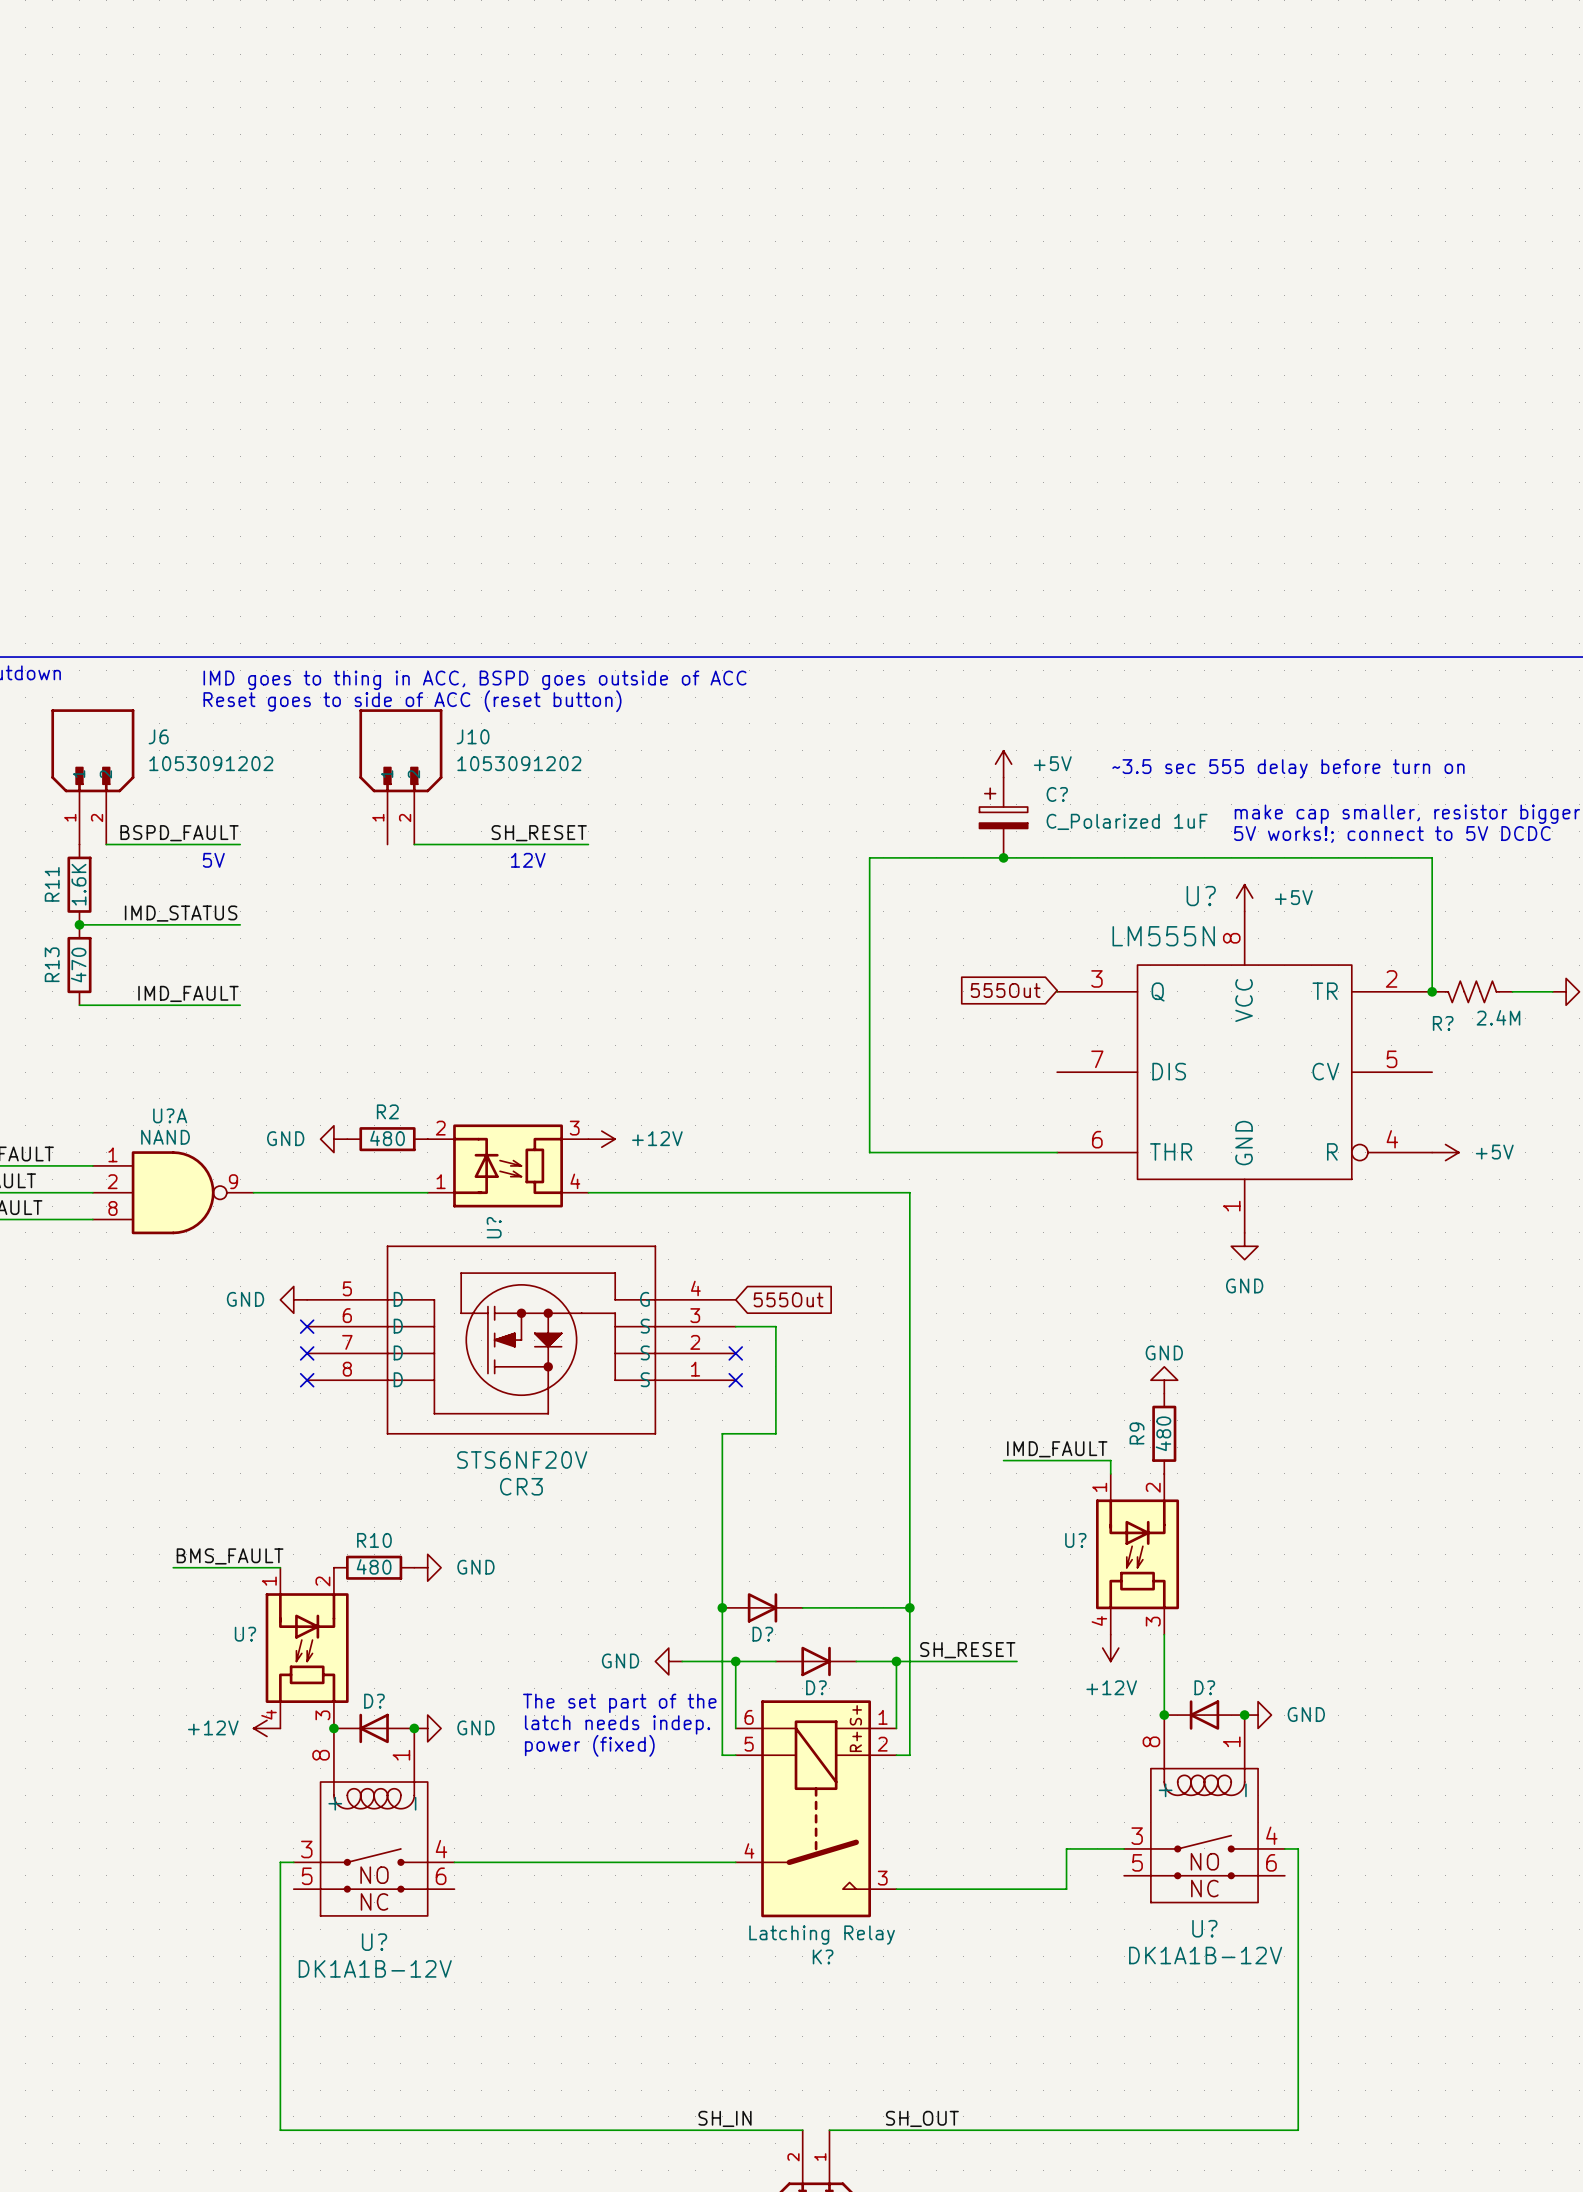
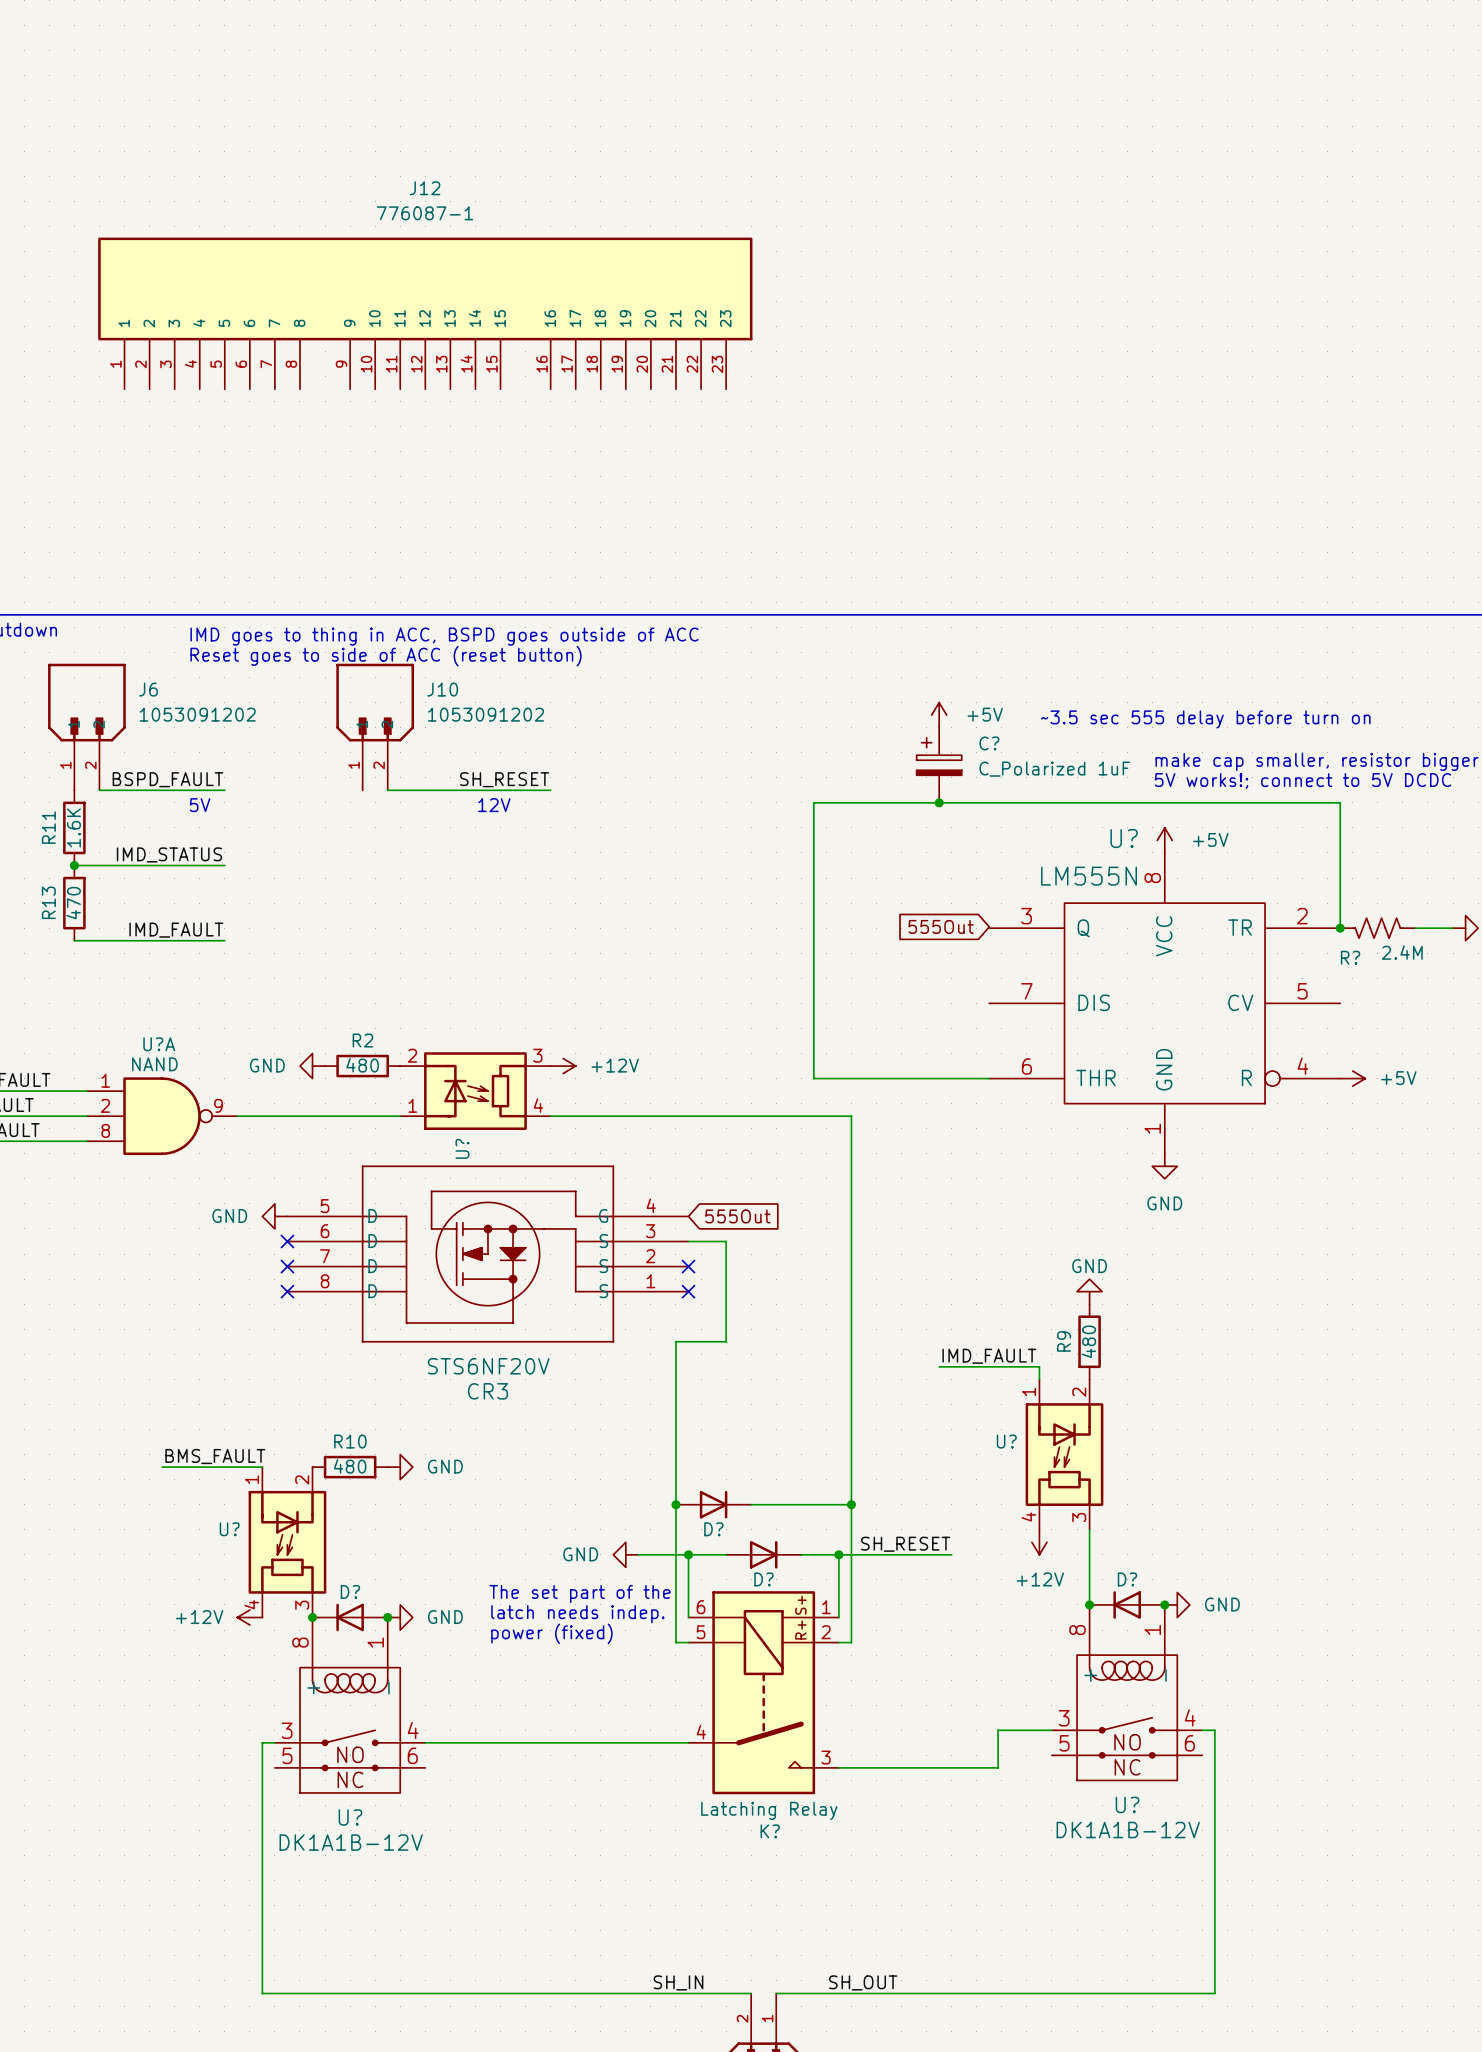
J12: none -> 776087-1 (425, 313)

